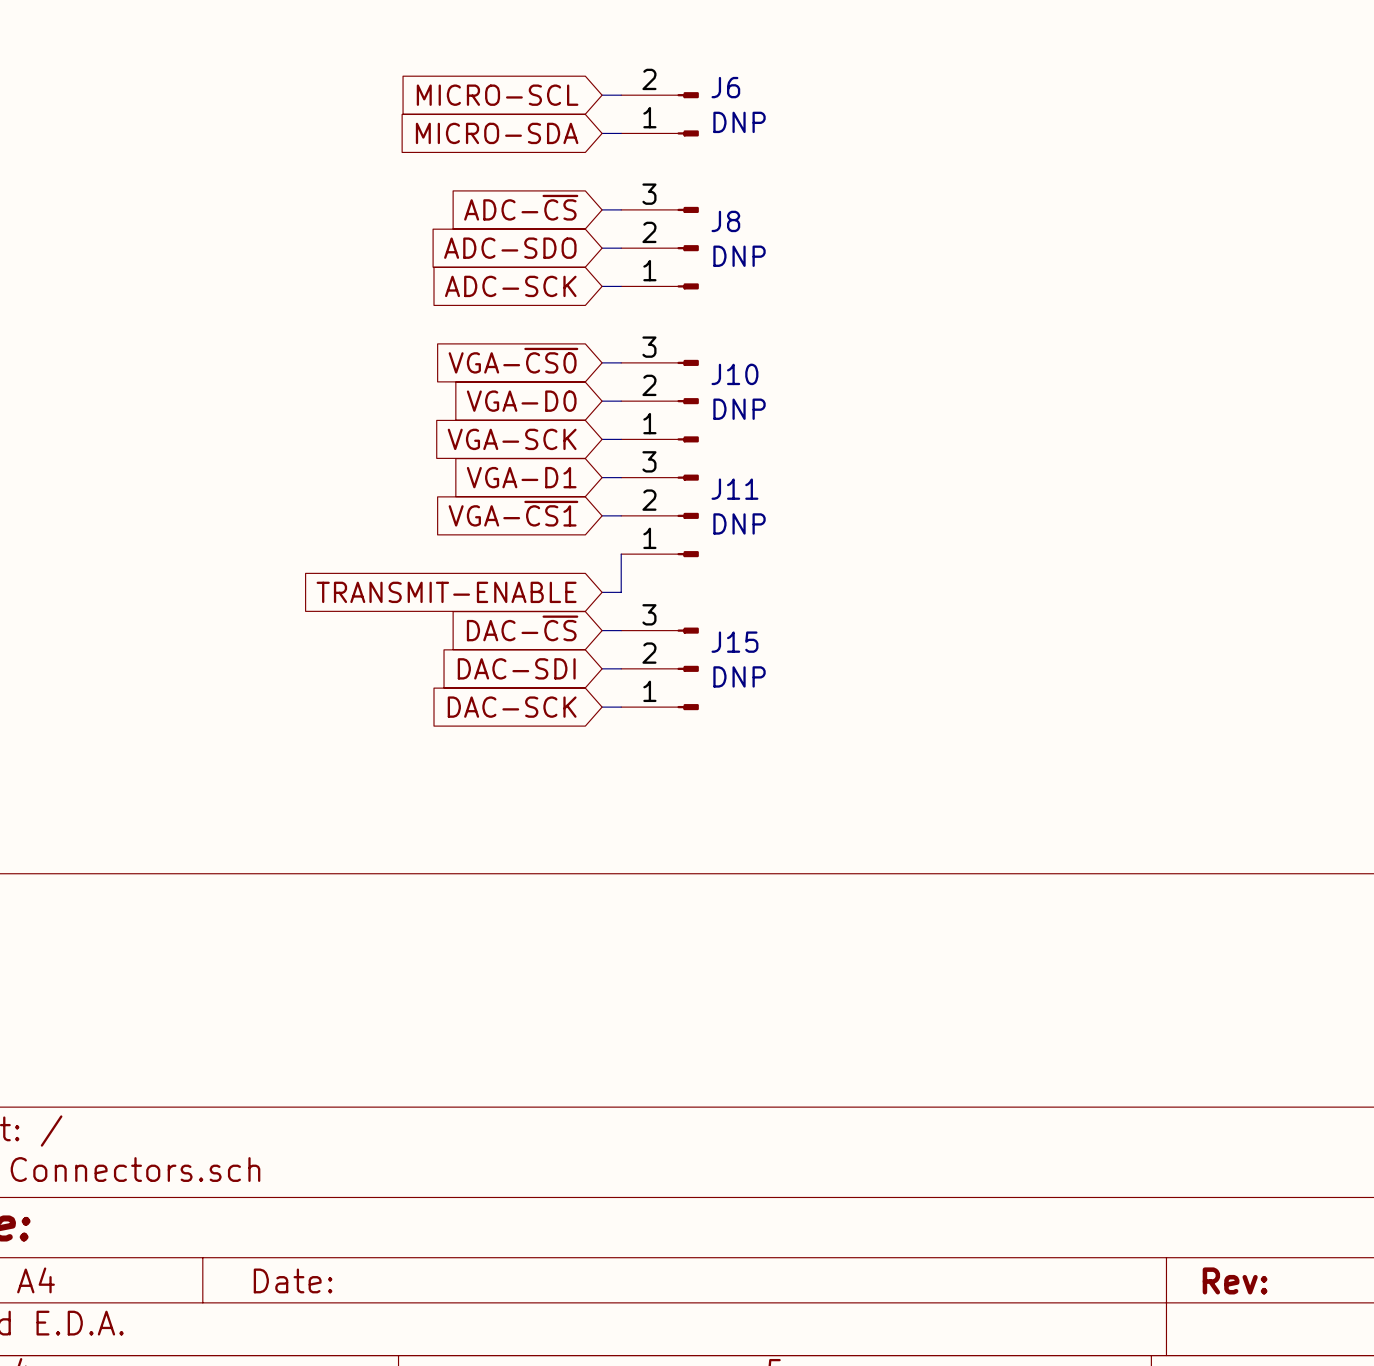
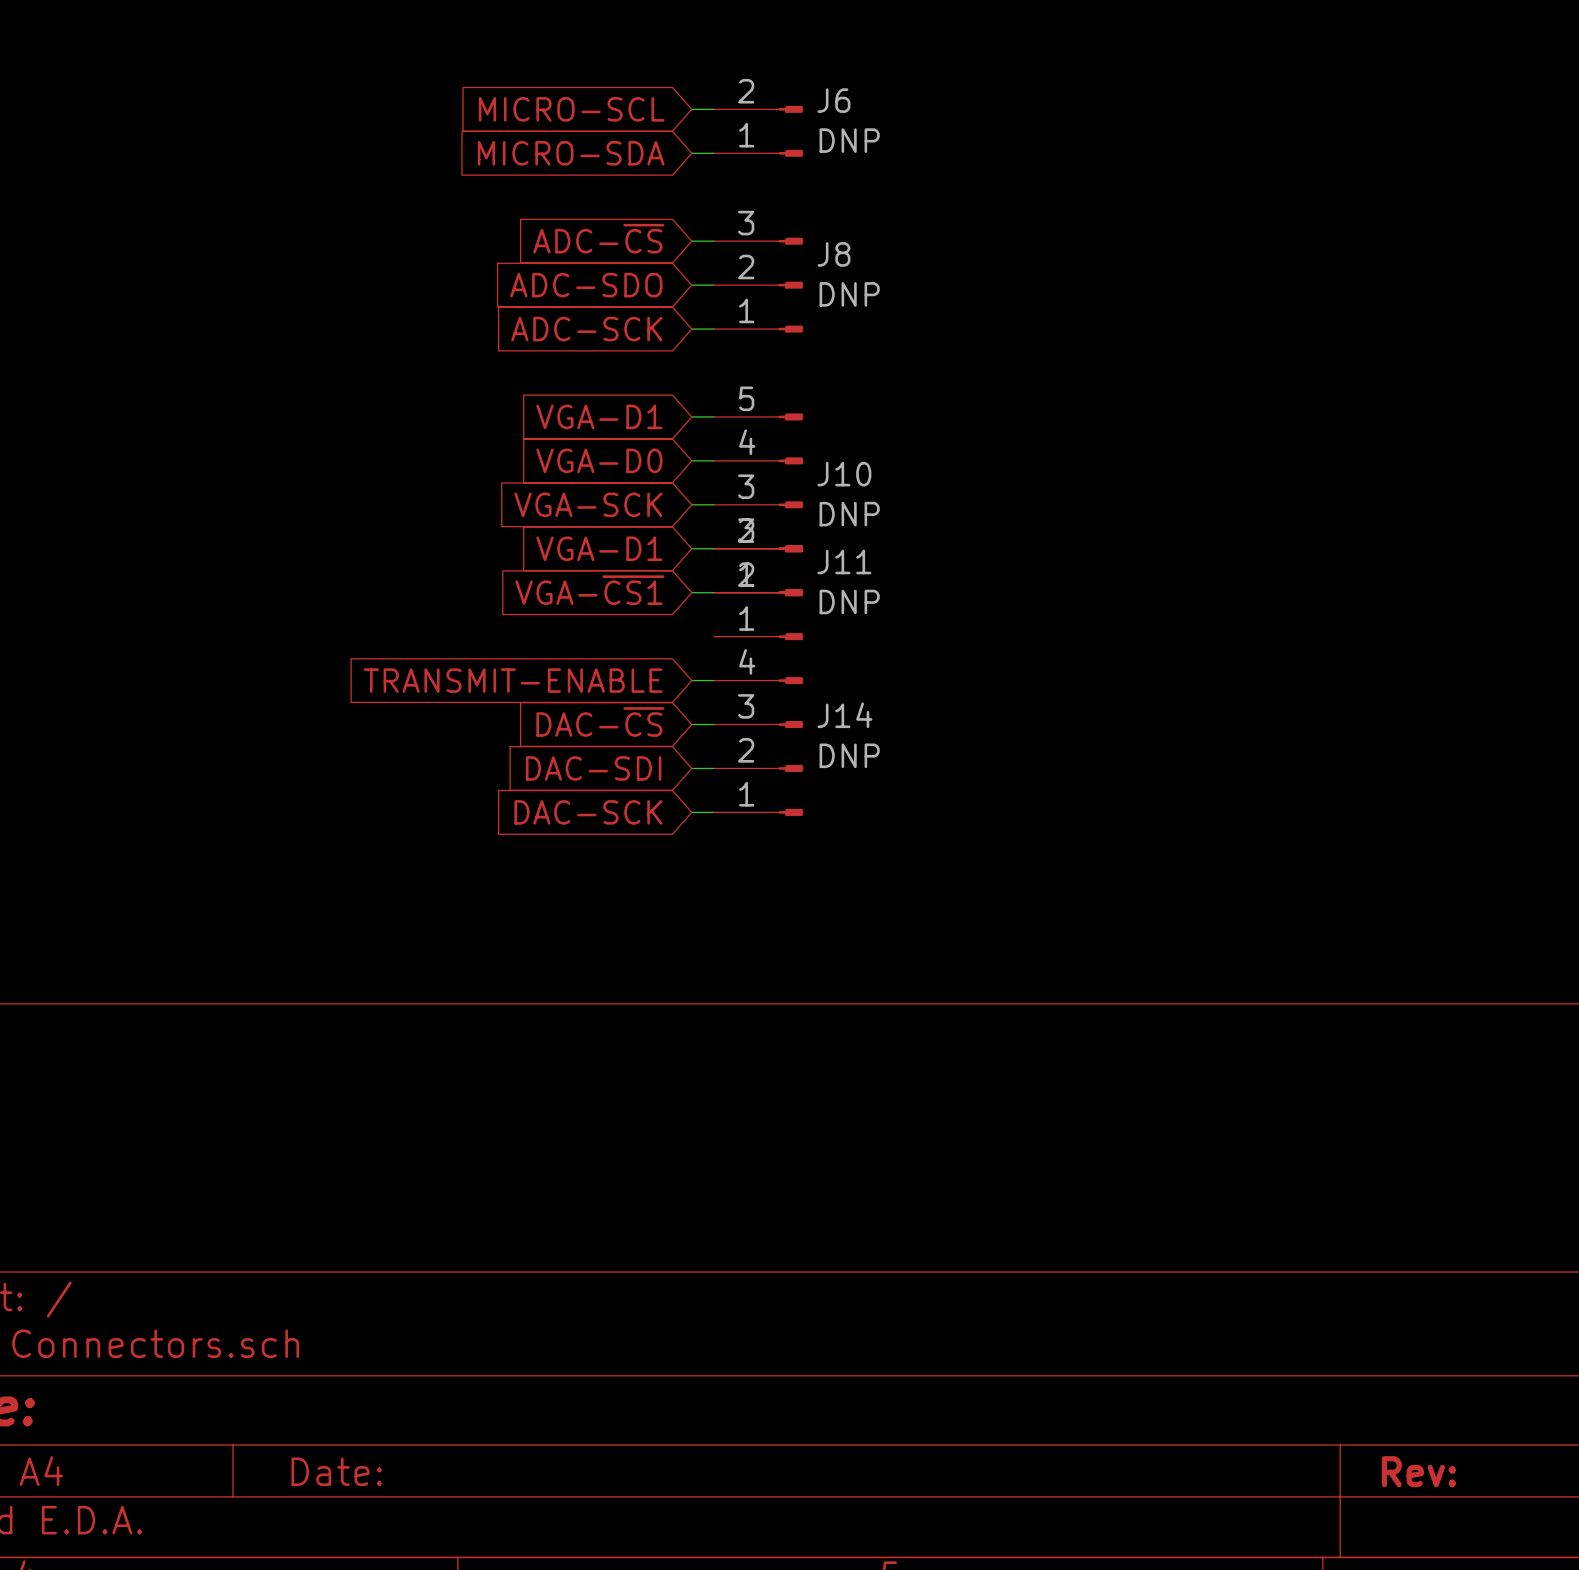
J10 symbol: [621, 359, 699, 443] -> [713, 413, 803, 597]
global label: VGA-~{CS0} (513, 360) -> VGA-D1 (599, 416)
wire: (621, 554) (621, 592) -> none
J14: none -> DNP (758, 746)
J15: DNP (660, 668) -> none

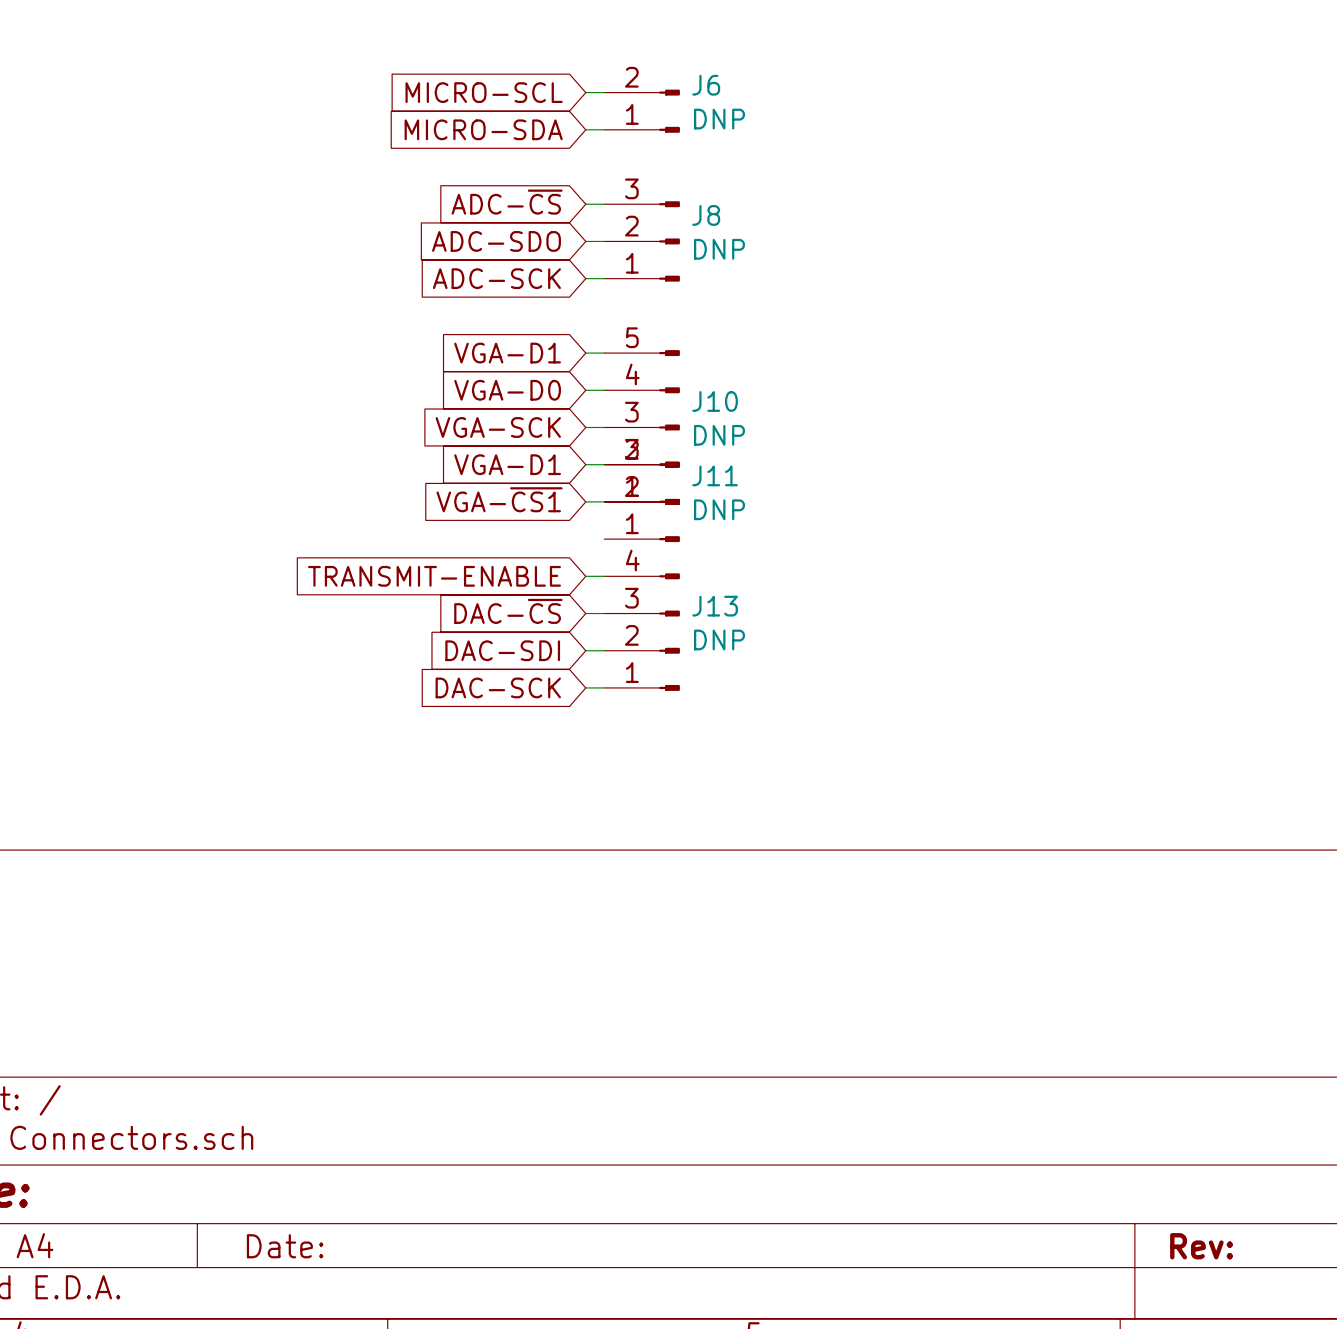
J14 name: J14 (844, 715) -> J13 (715, 606)

